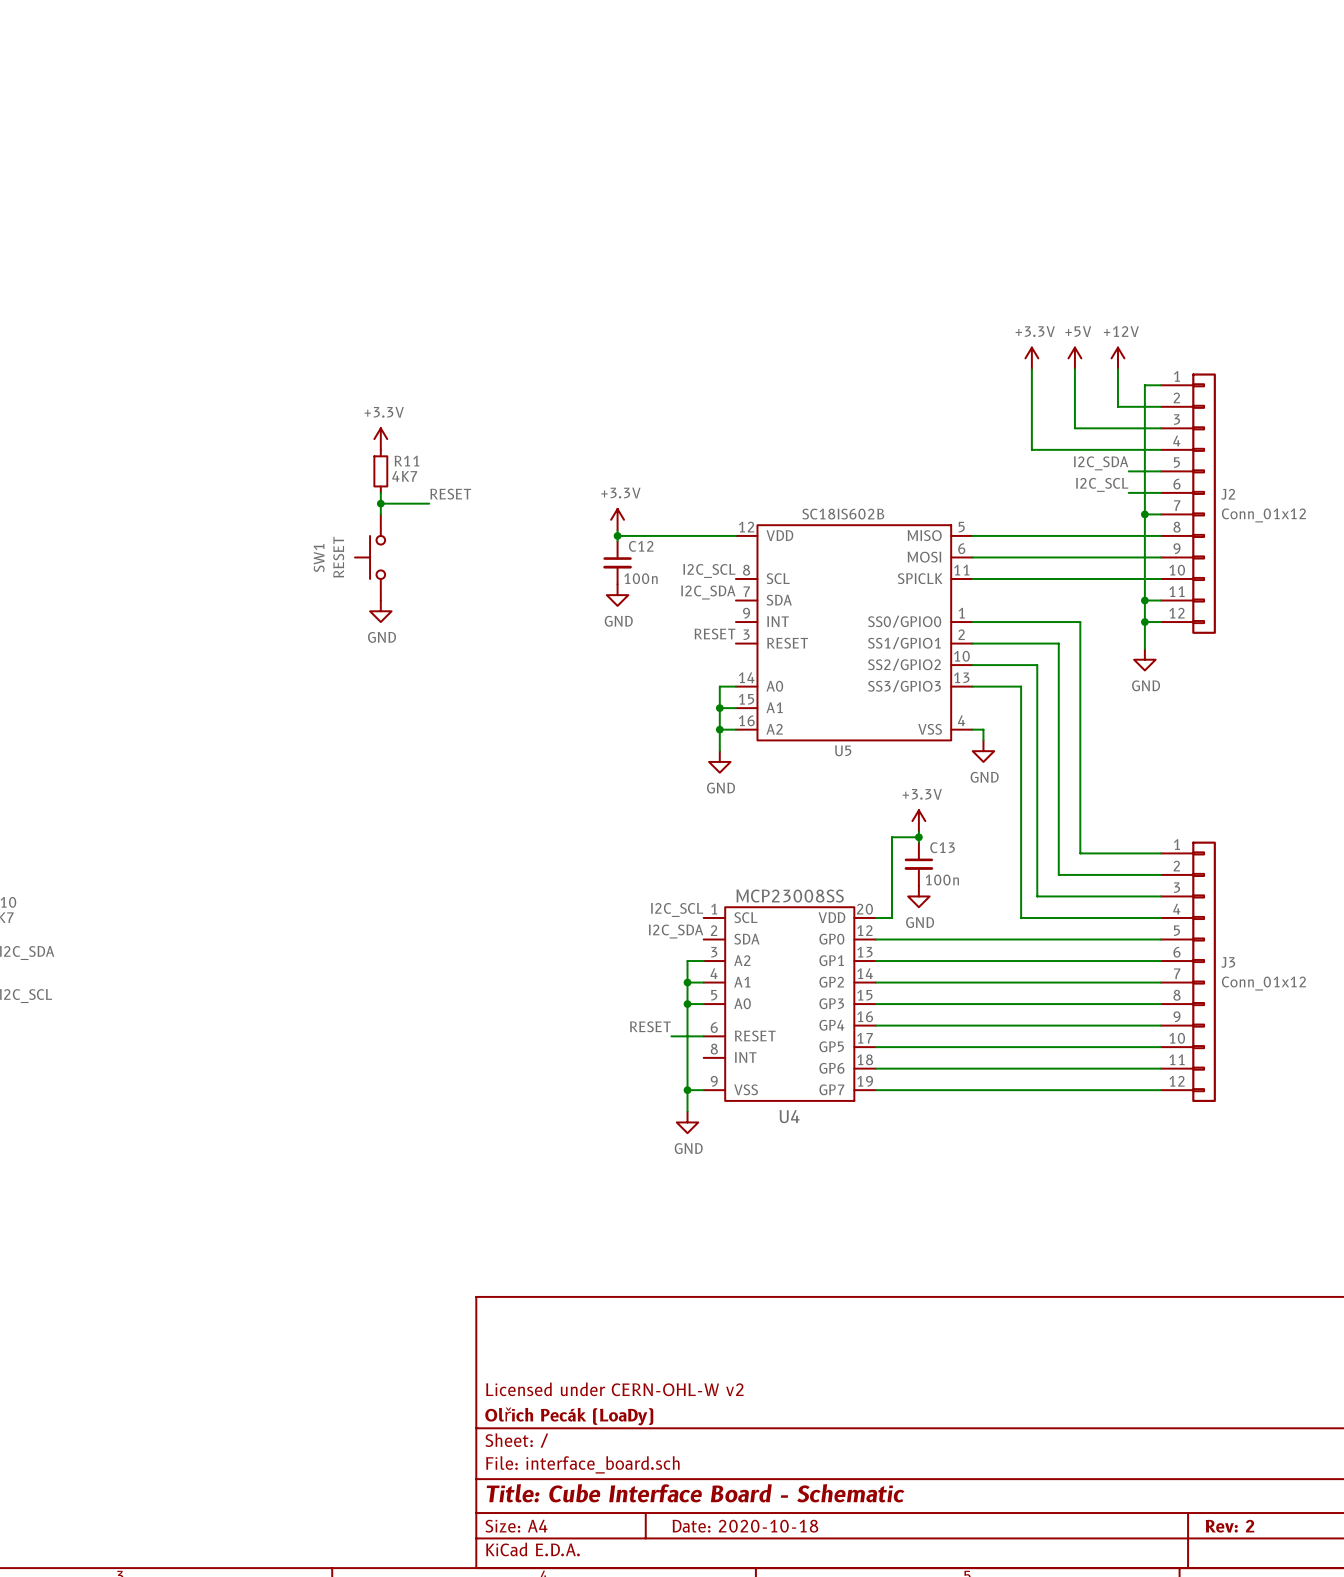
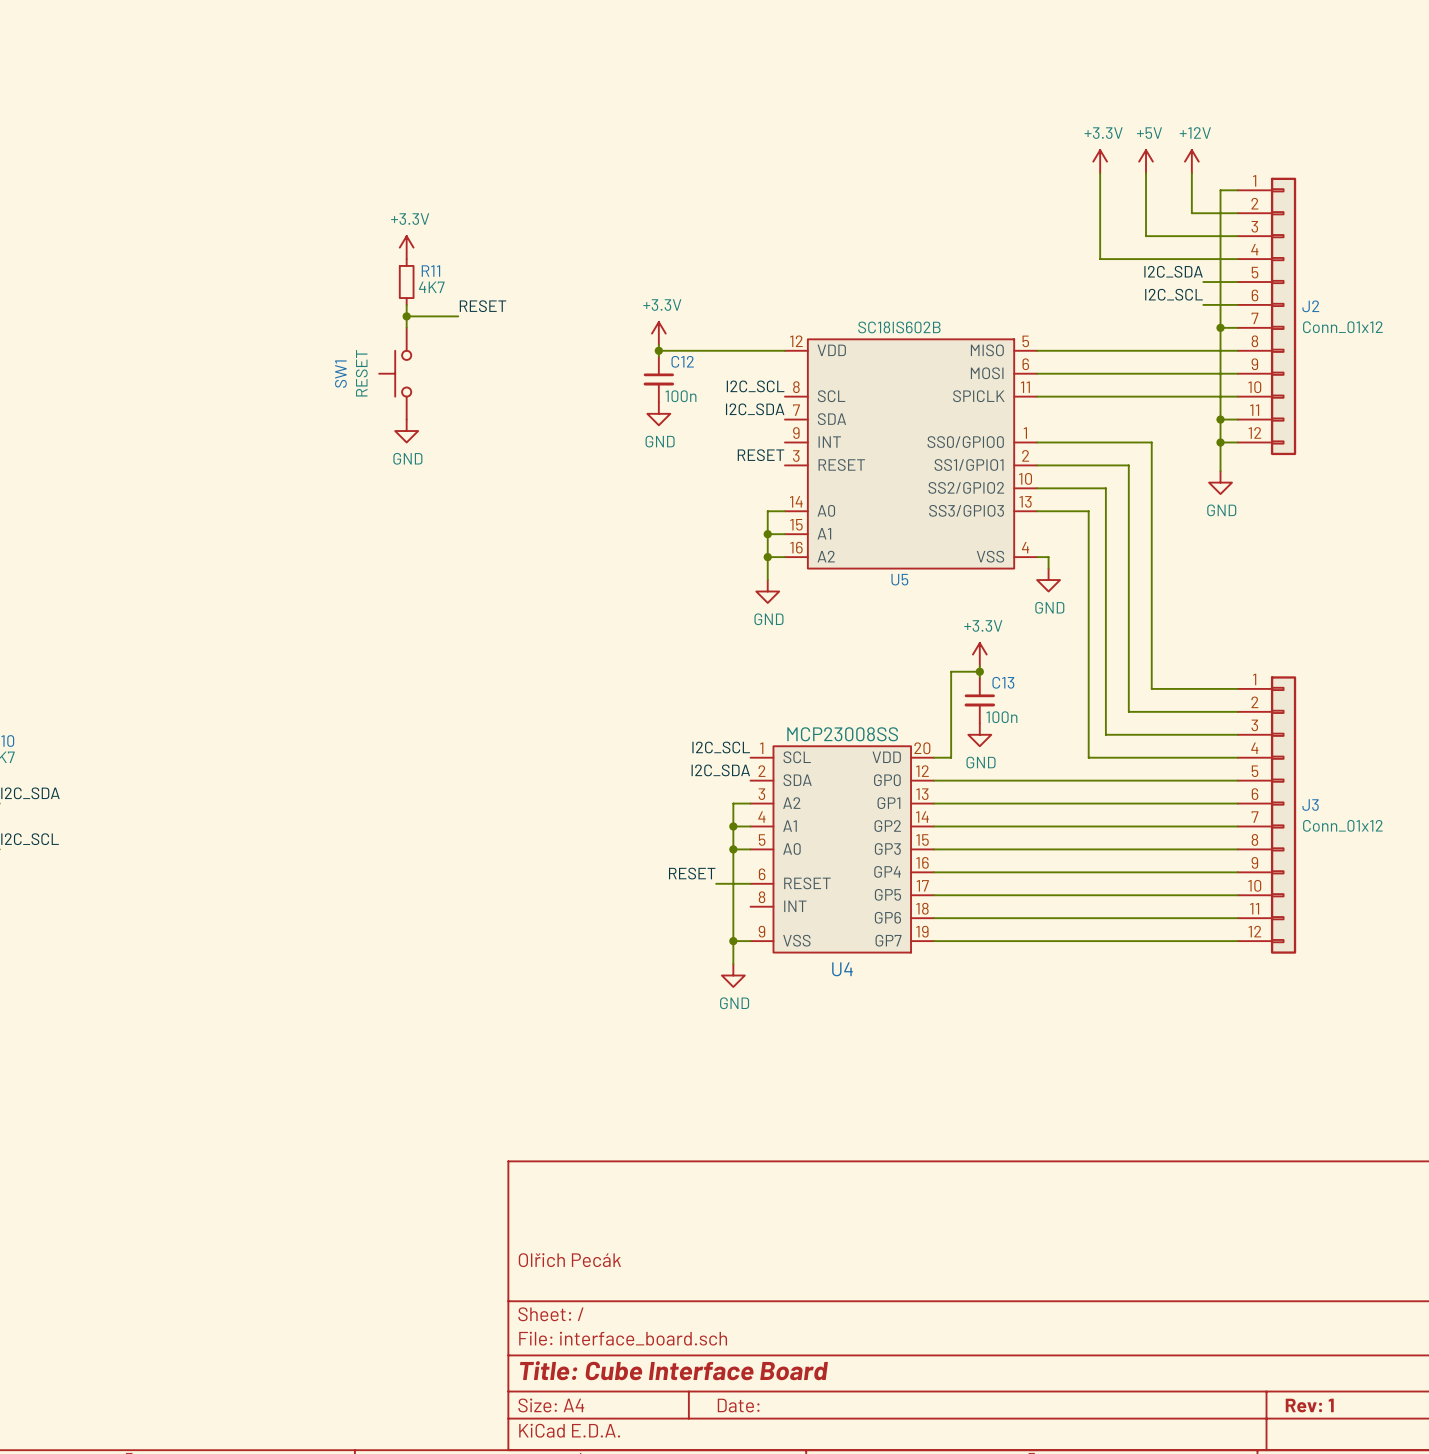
title block: Licensed under CERN-OHL-W v2 (614, 1389) -> Olřich Pecák (569, 1260)
title block: Olřich Pecák (LoaDy) (569, 1416) -> none
title block: Title: Cube Interface Board - Schematic (695, 1493) -> Title: Cube Interface Board (673, 1370)
title block: Date: 2020-10-18 (745, 1526) -> Date: (738, 1405)
title block: Rev: 2 (1230, 1526) -> Rev: 1 (1309, 1405)

